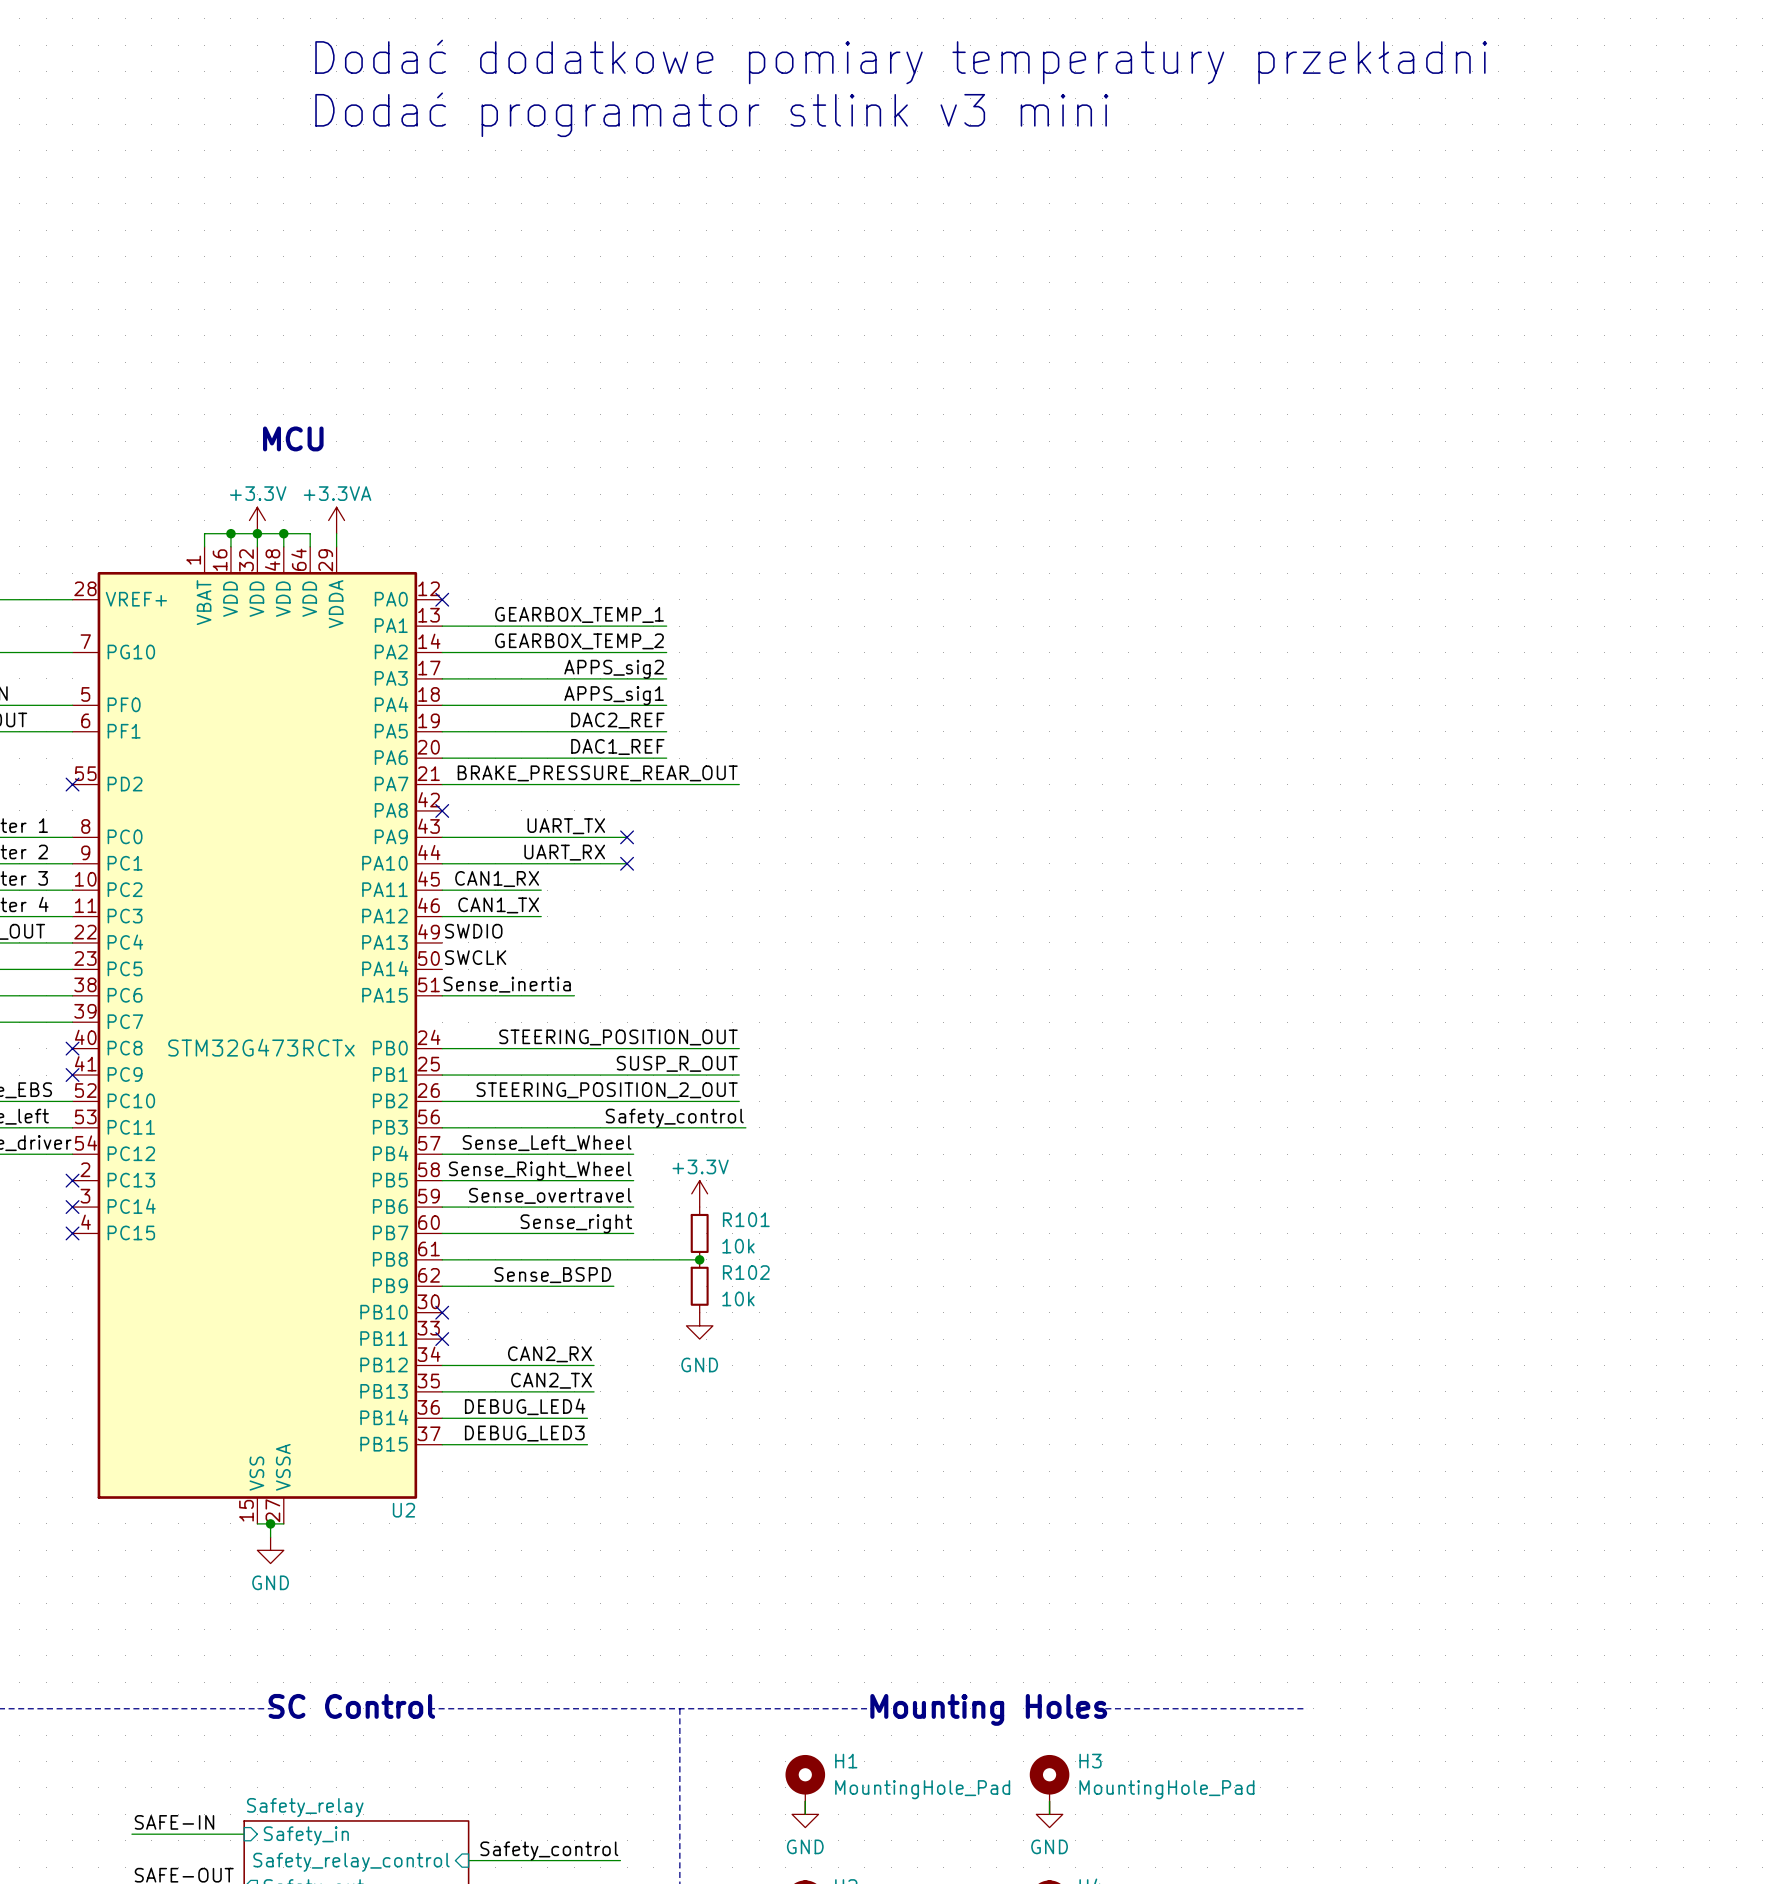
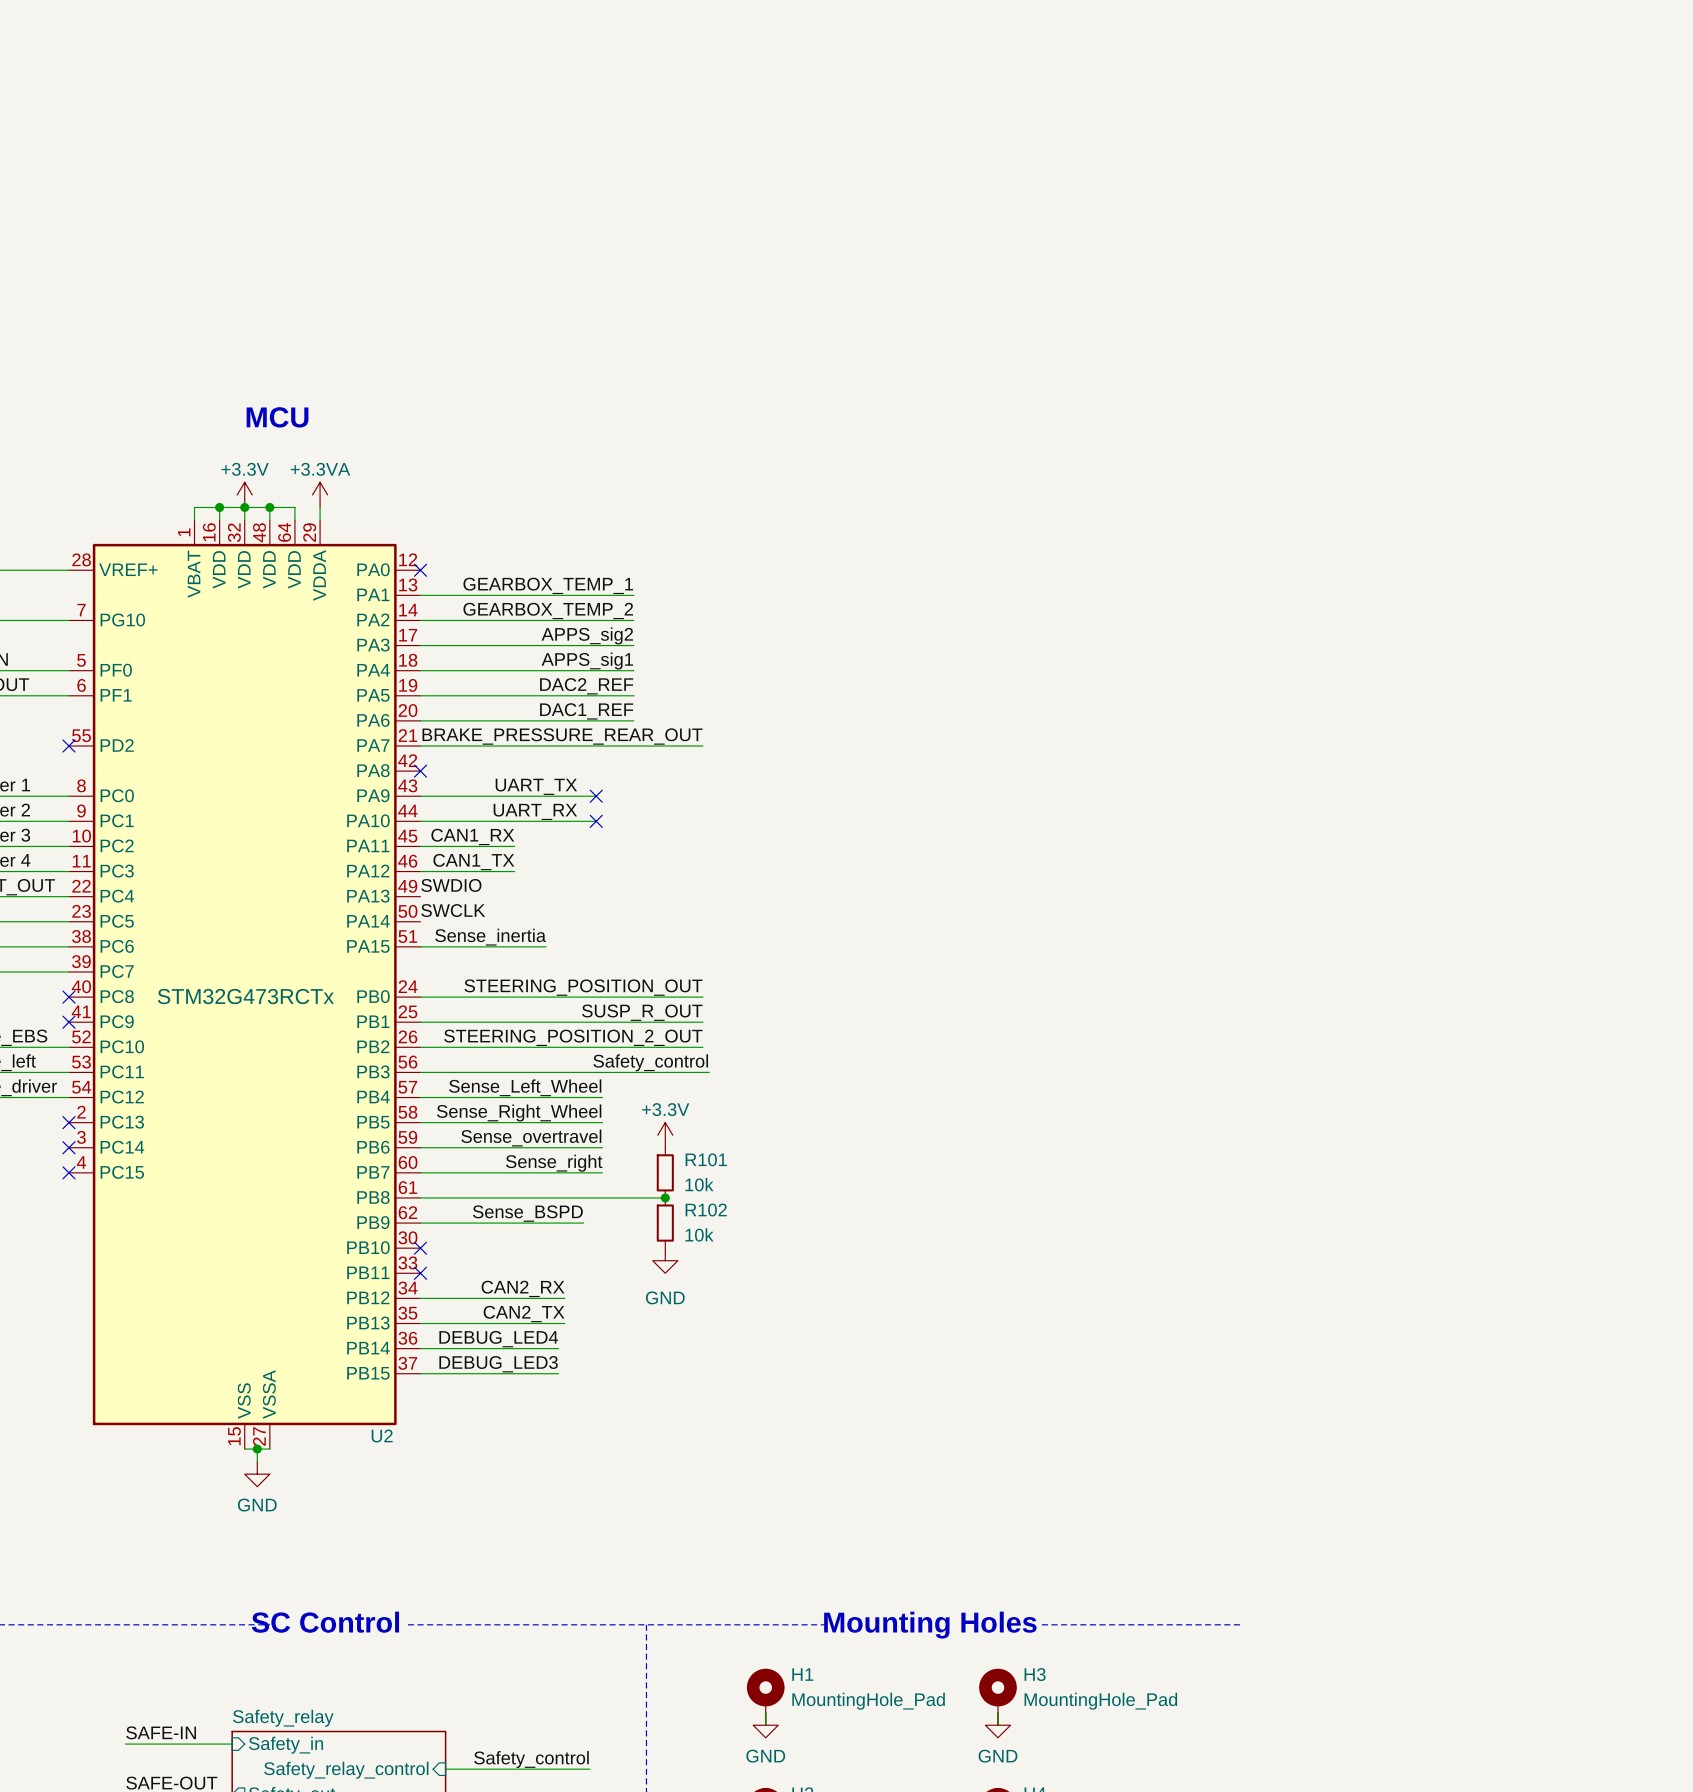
text: Dodać dodatkowe pomiary temperatury przekładni (901, 61) -> none
text: Dodać programator stlink v3 mini (711, 114) -> none

